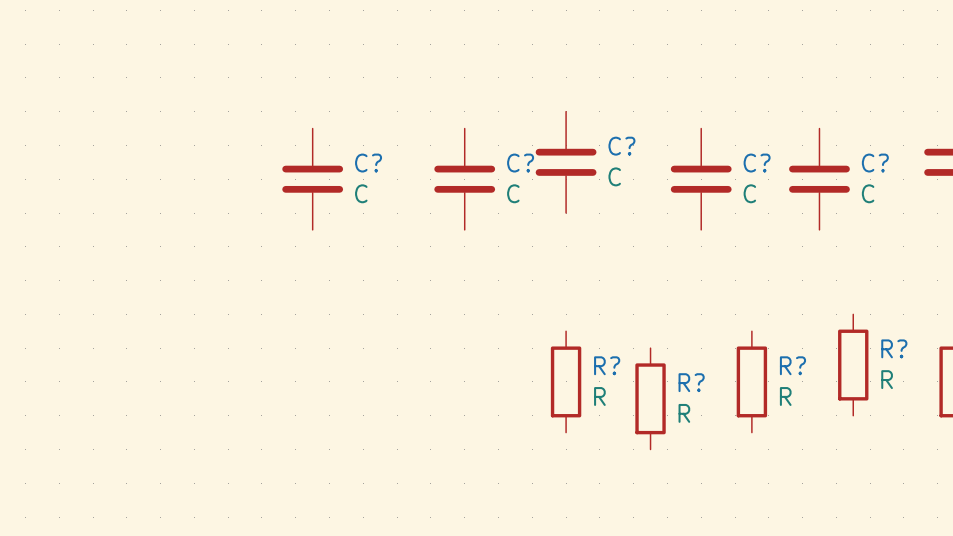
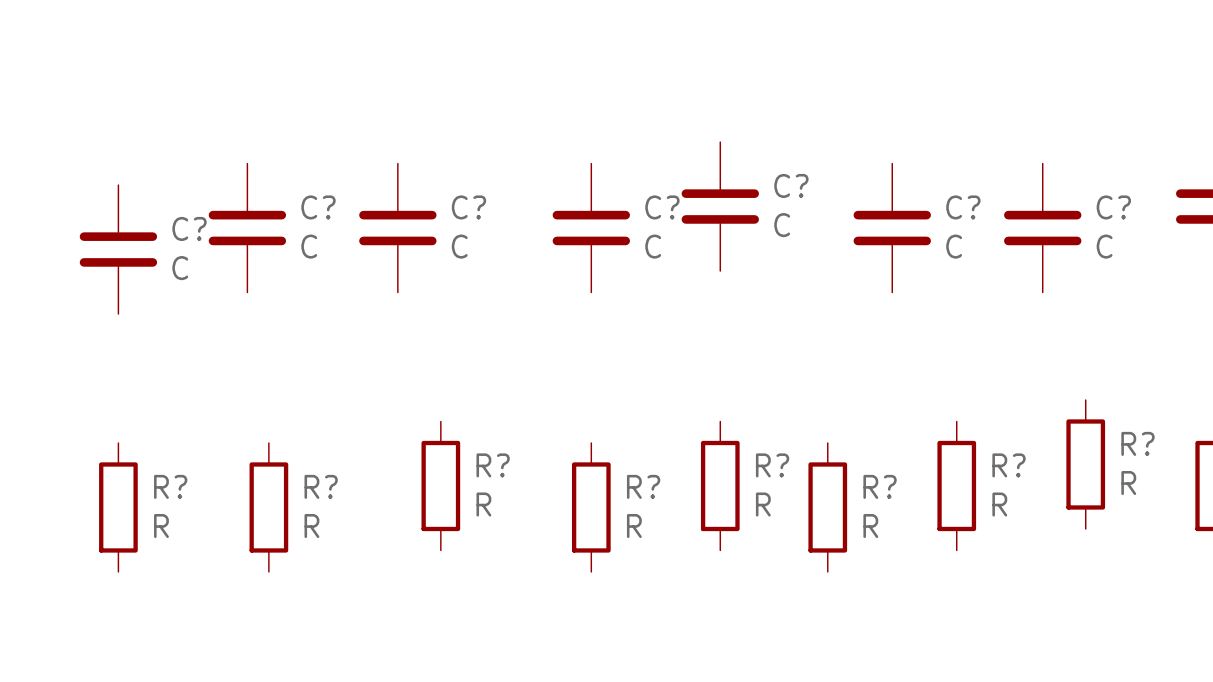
C?: none -> C (247, 228)
C?: none -> C (118, 249)
R?: none -> R (440, 485)
R?: none -> R (118, 507)
R?: none -> R (268, 507)
R?: none -> R (591, 507)

